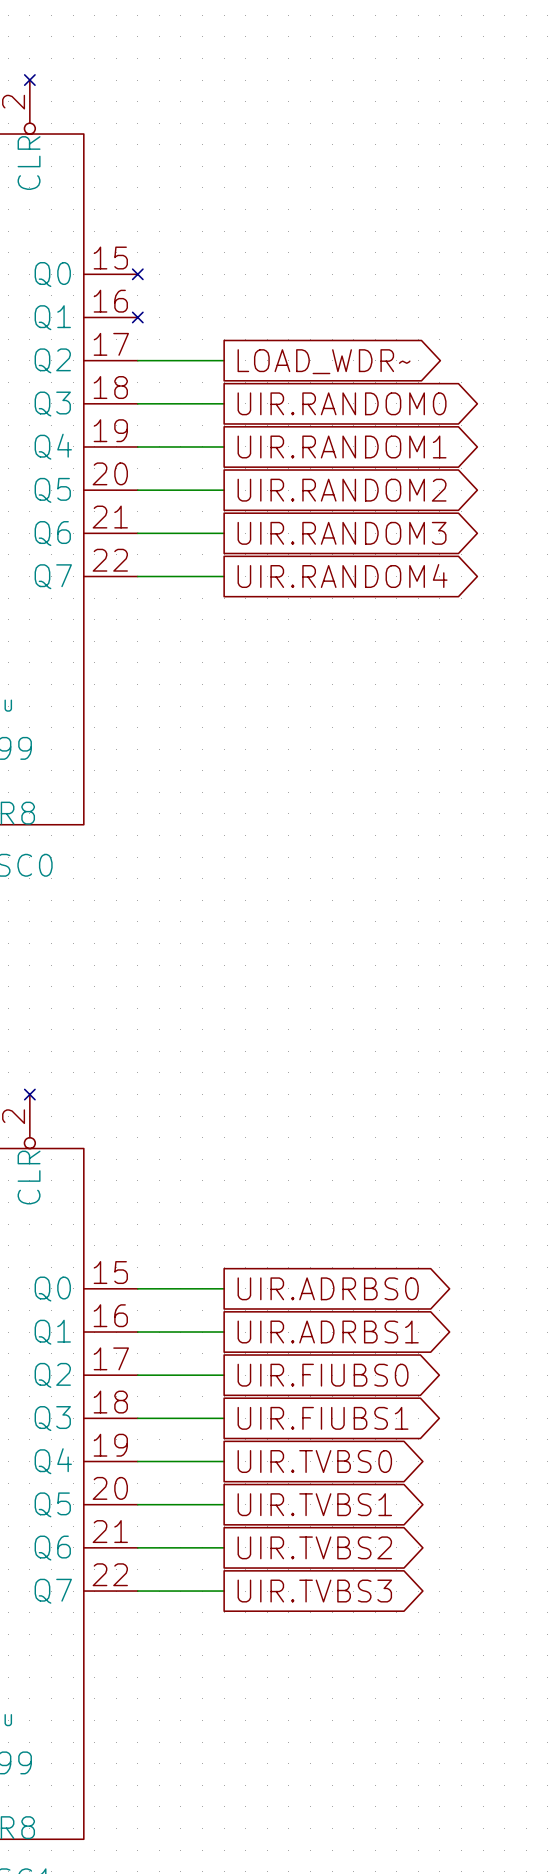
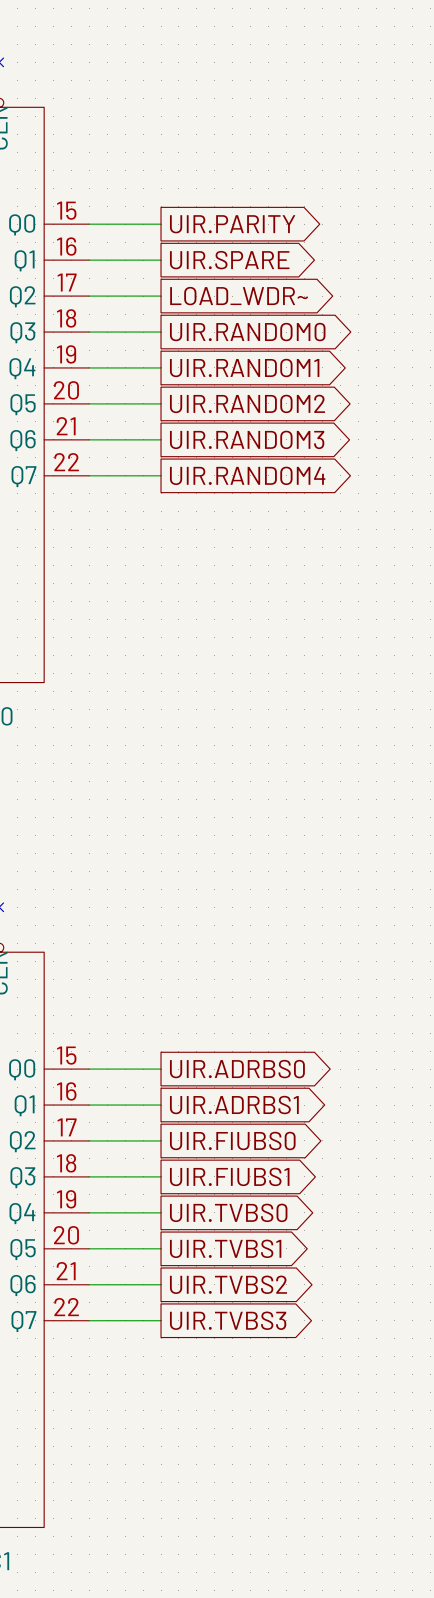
wire: none -> (89, 224) (161, 224)
no-connect mark: (137, 274) -> none
global label: none -> UIR.PARITY (232, 224)
wire: none -> (89, 260) (161, 260)
no-connect mark: (137, 317) -> none
global label: none -> UIR.SPARE (229, 260)

